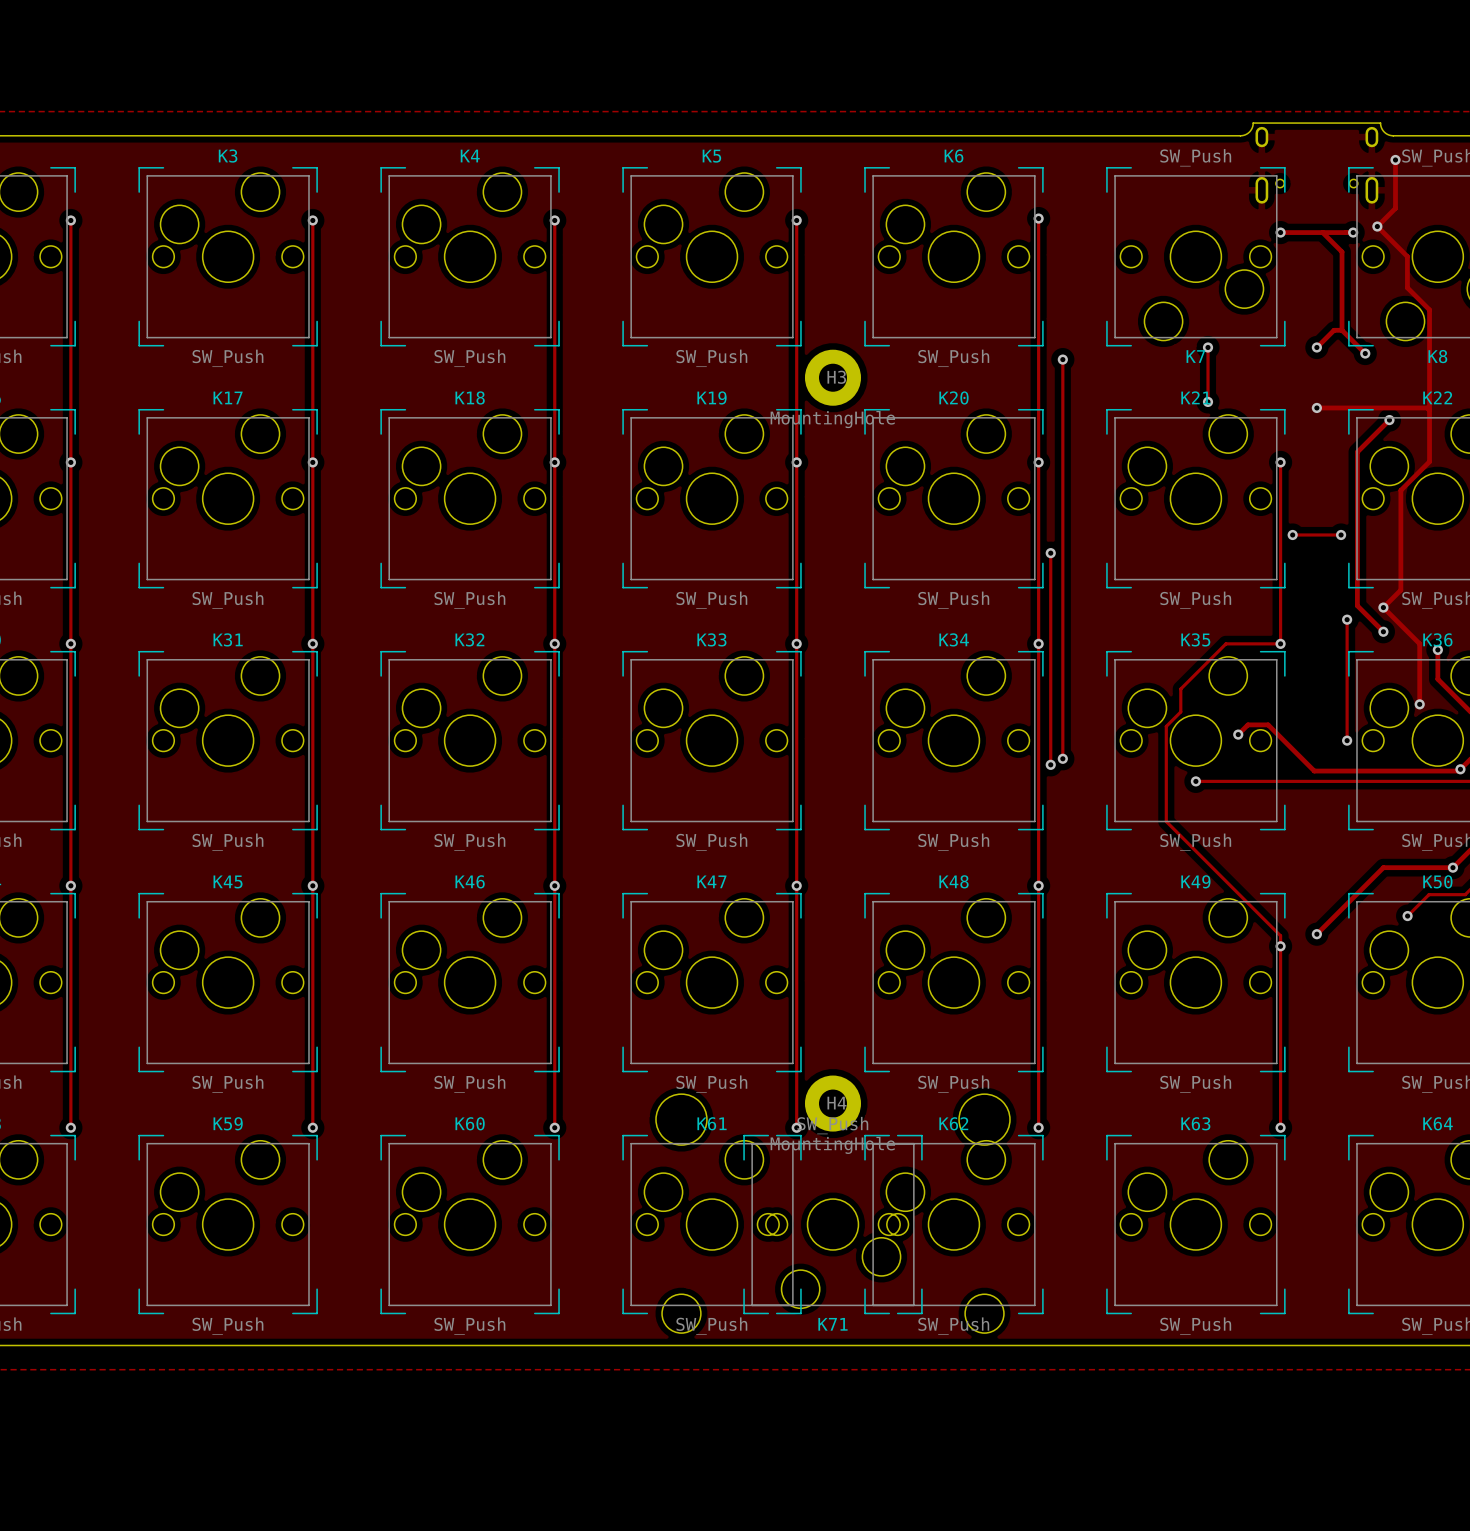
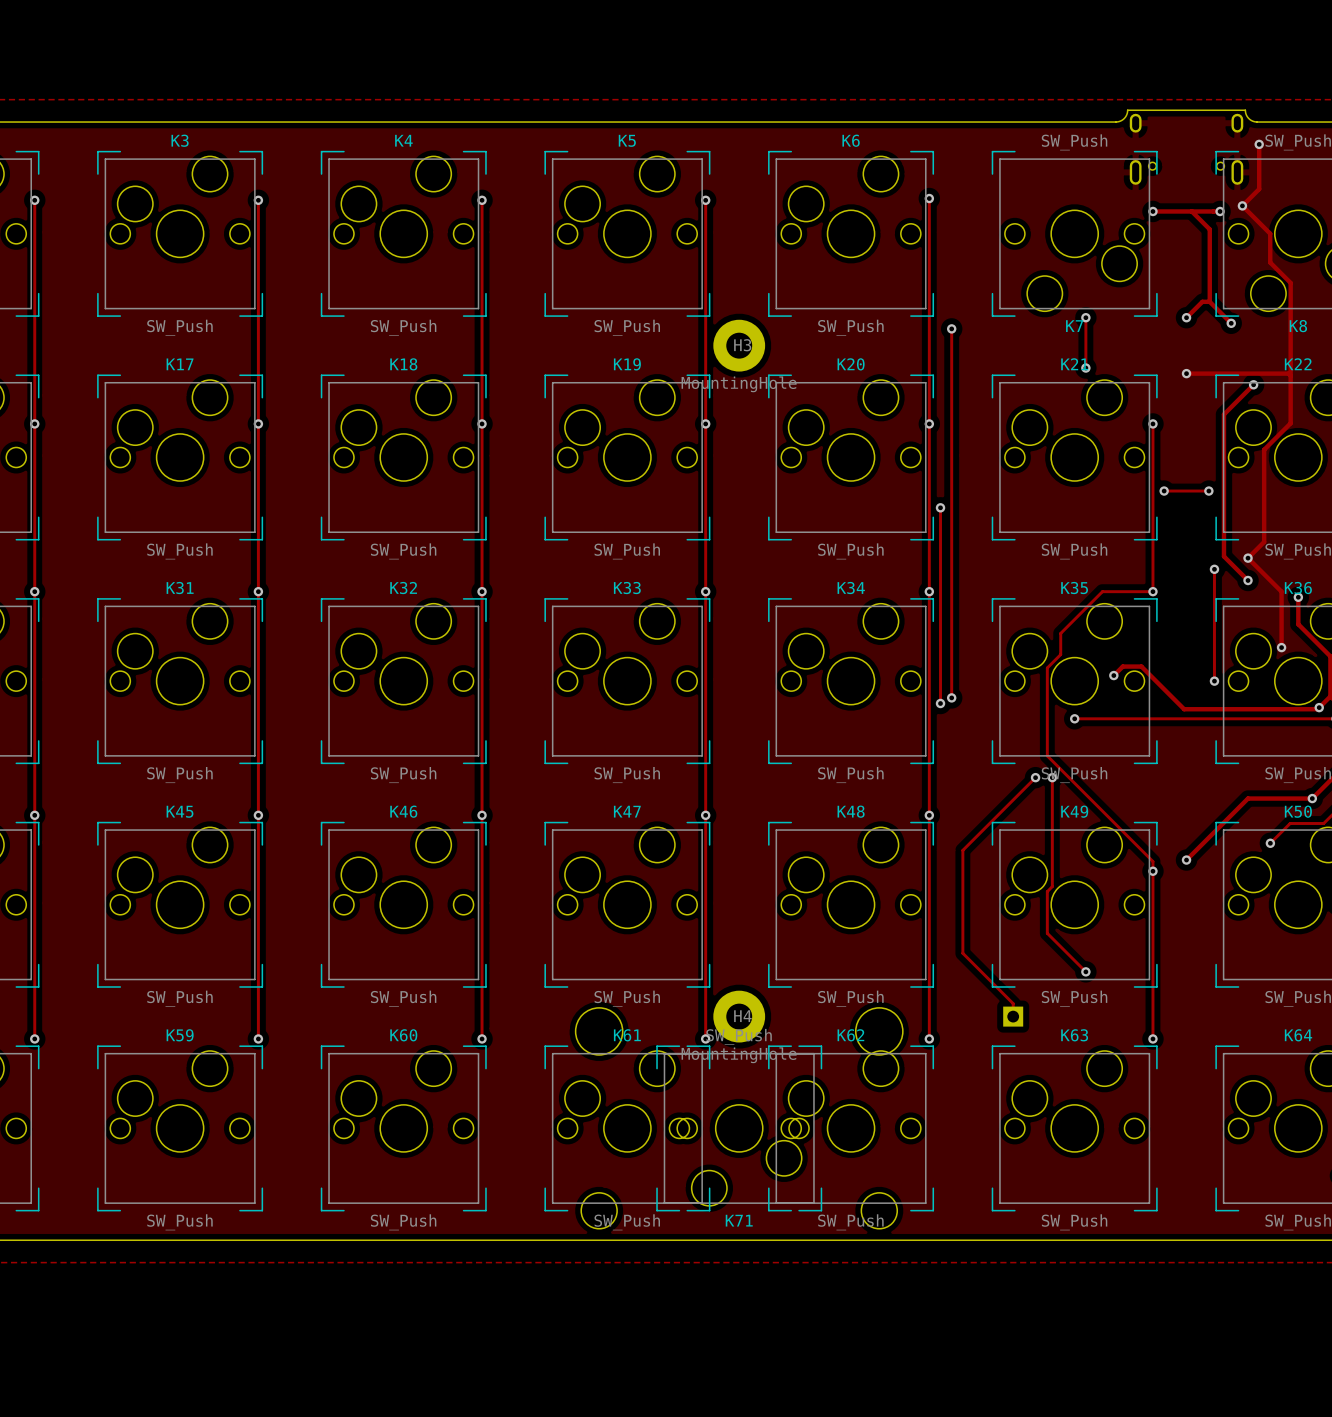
track: none -> (1035, 777) (962, 850) (962, 953) (1013, 1003) (1013, 1016)
via: none -> (1035, 777)
track: none -> (1052, 777) (1052, 886) (1047, 891) (1047, 933) (1085, 971)
via: none -> (1052, 777)
via: none -> (1085, 971)
part: none -> (1013, 1016)

